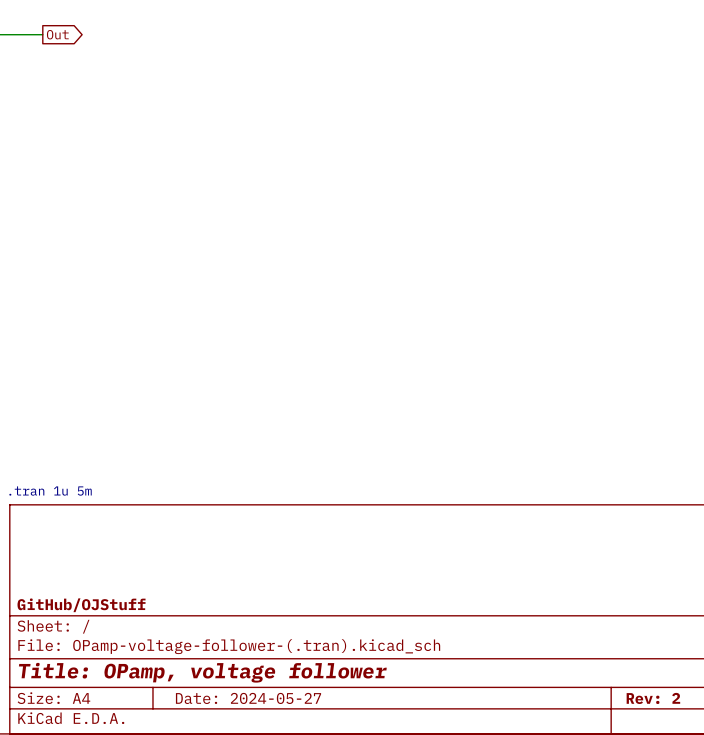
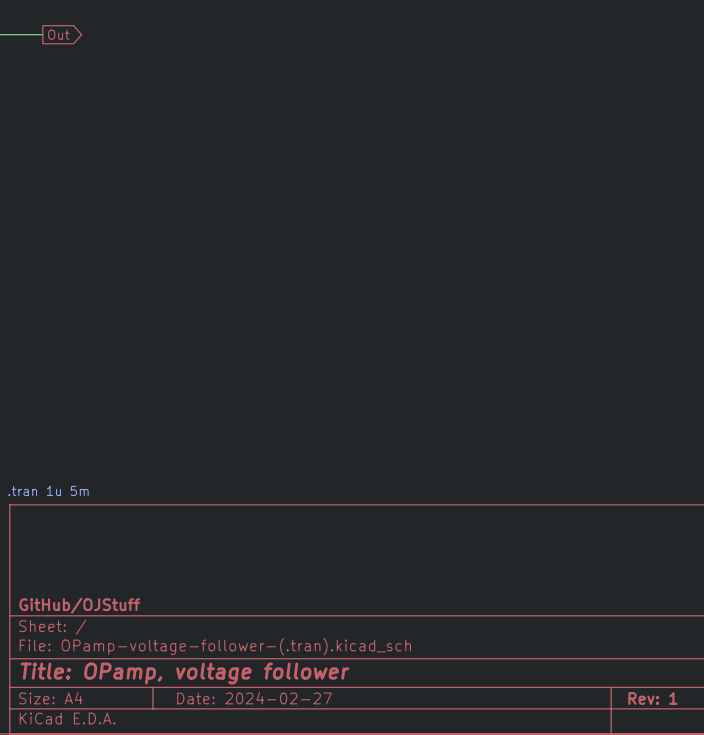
title block: Date: 2024-05-27 (248, 698) -> Date: 2024-02-27 (254, 698)
title block: Rev: 2 (653, 698) -> Rev: 1 (652, 698)

